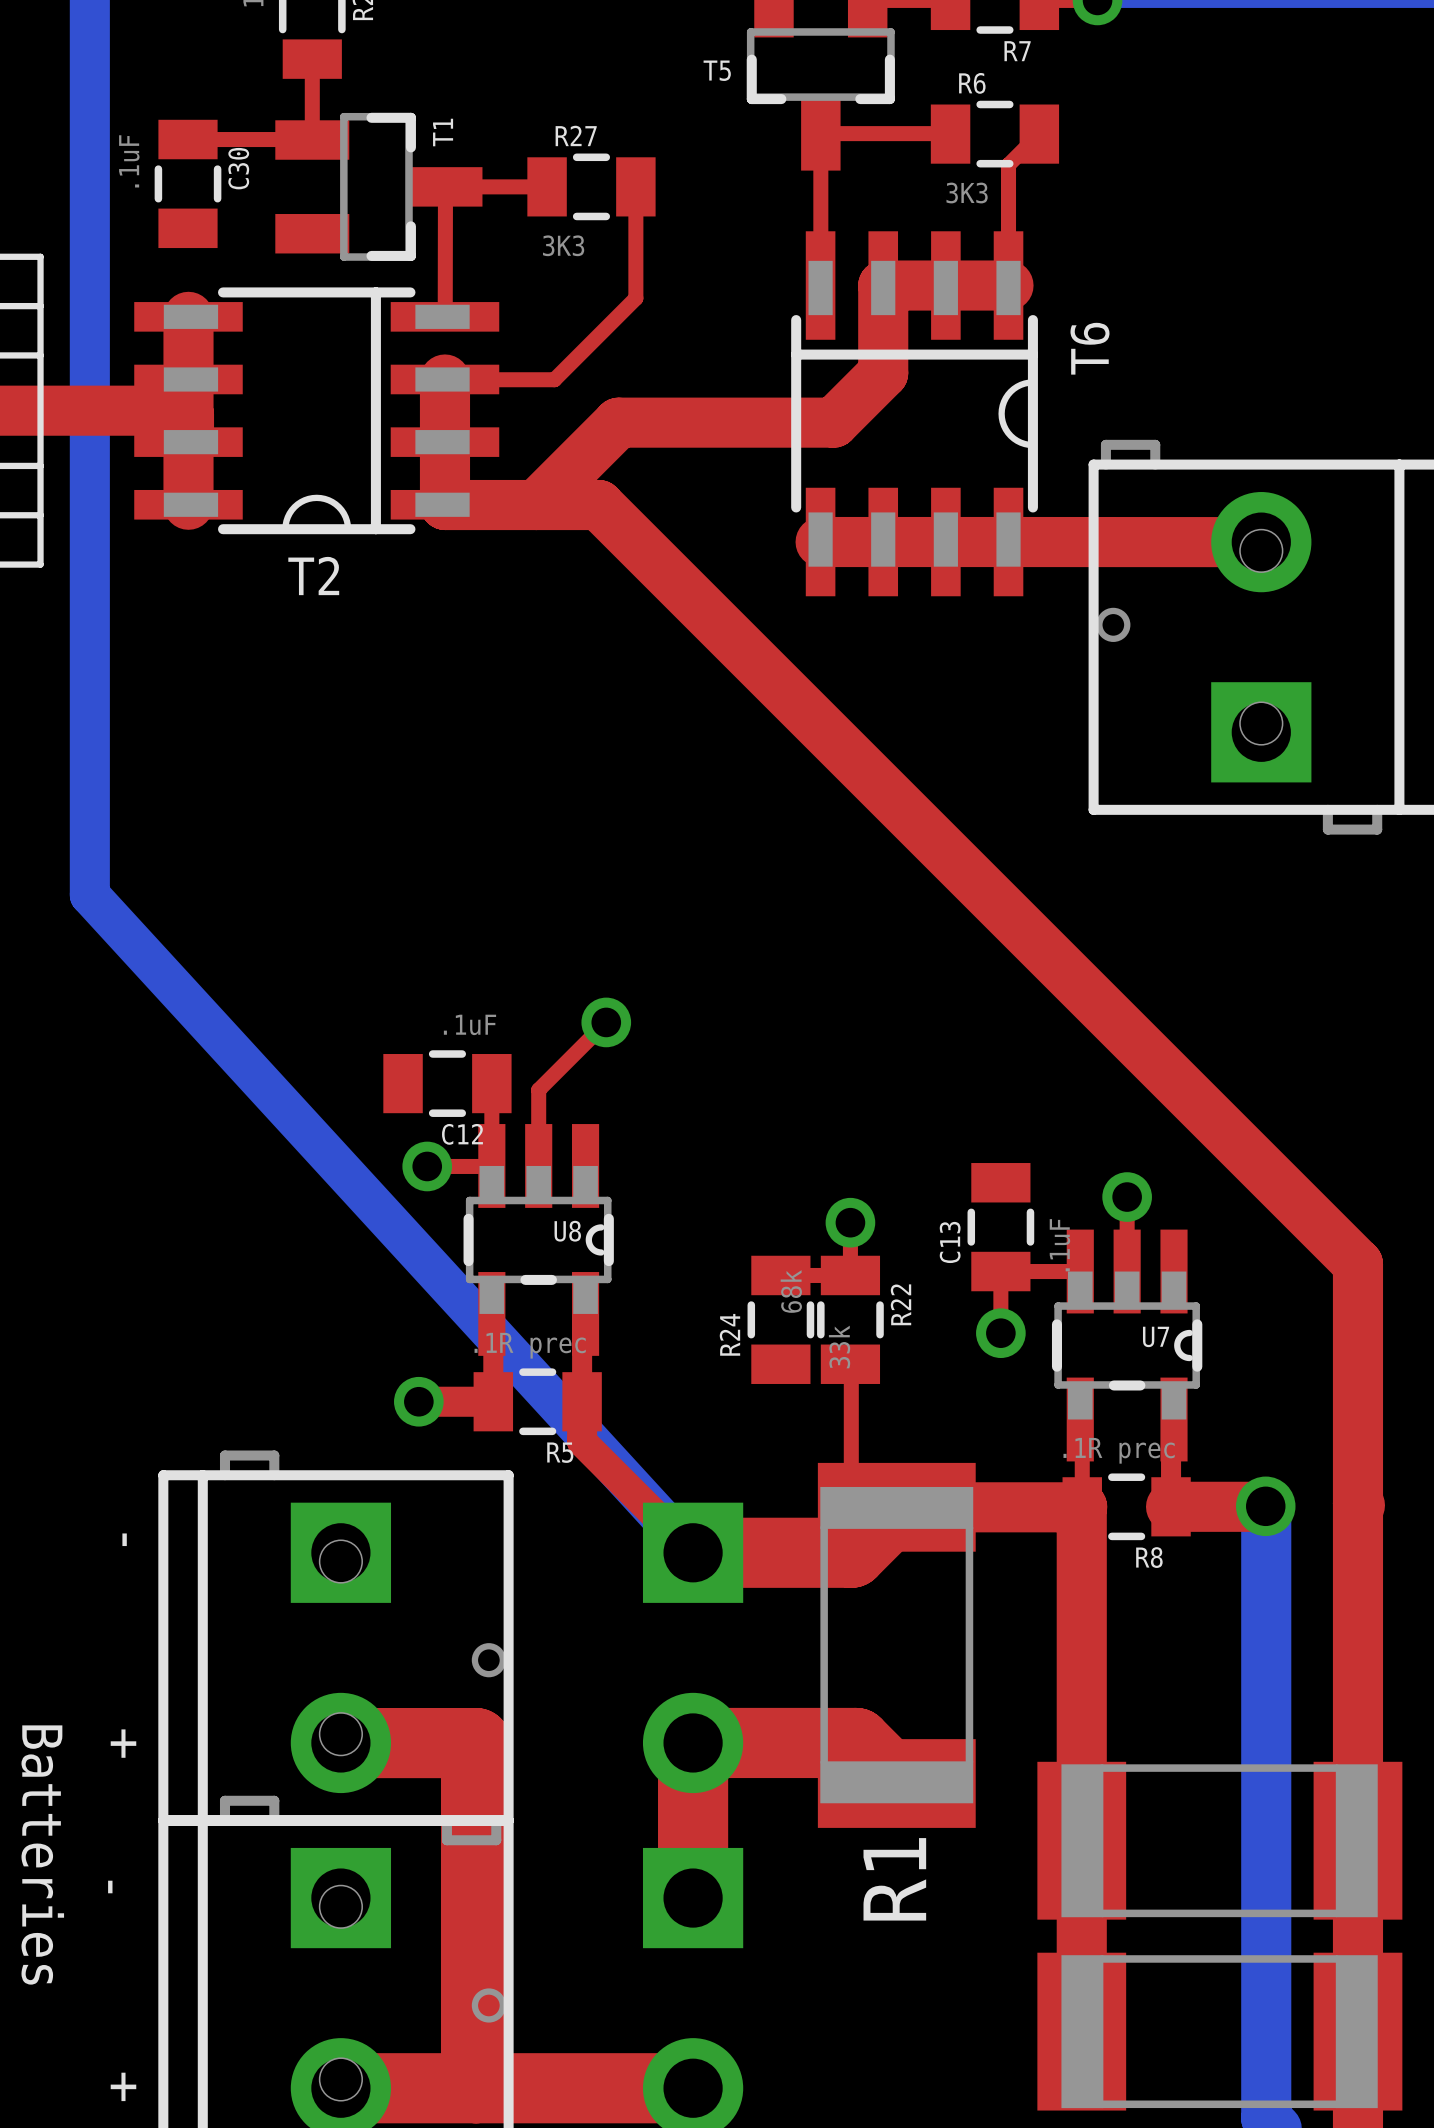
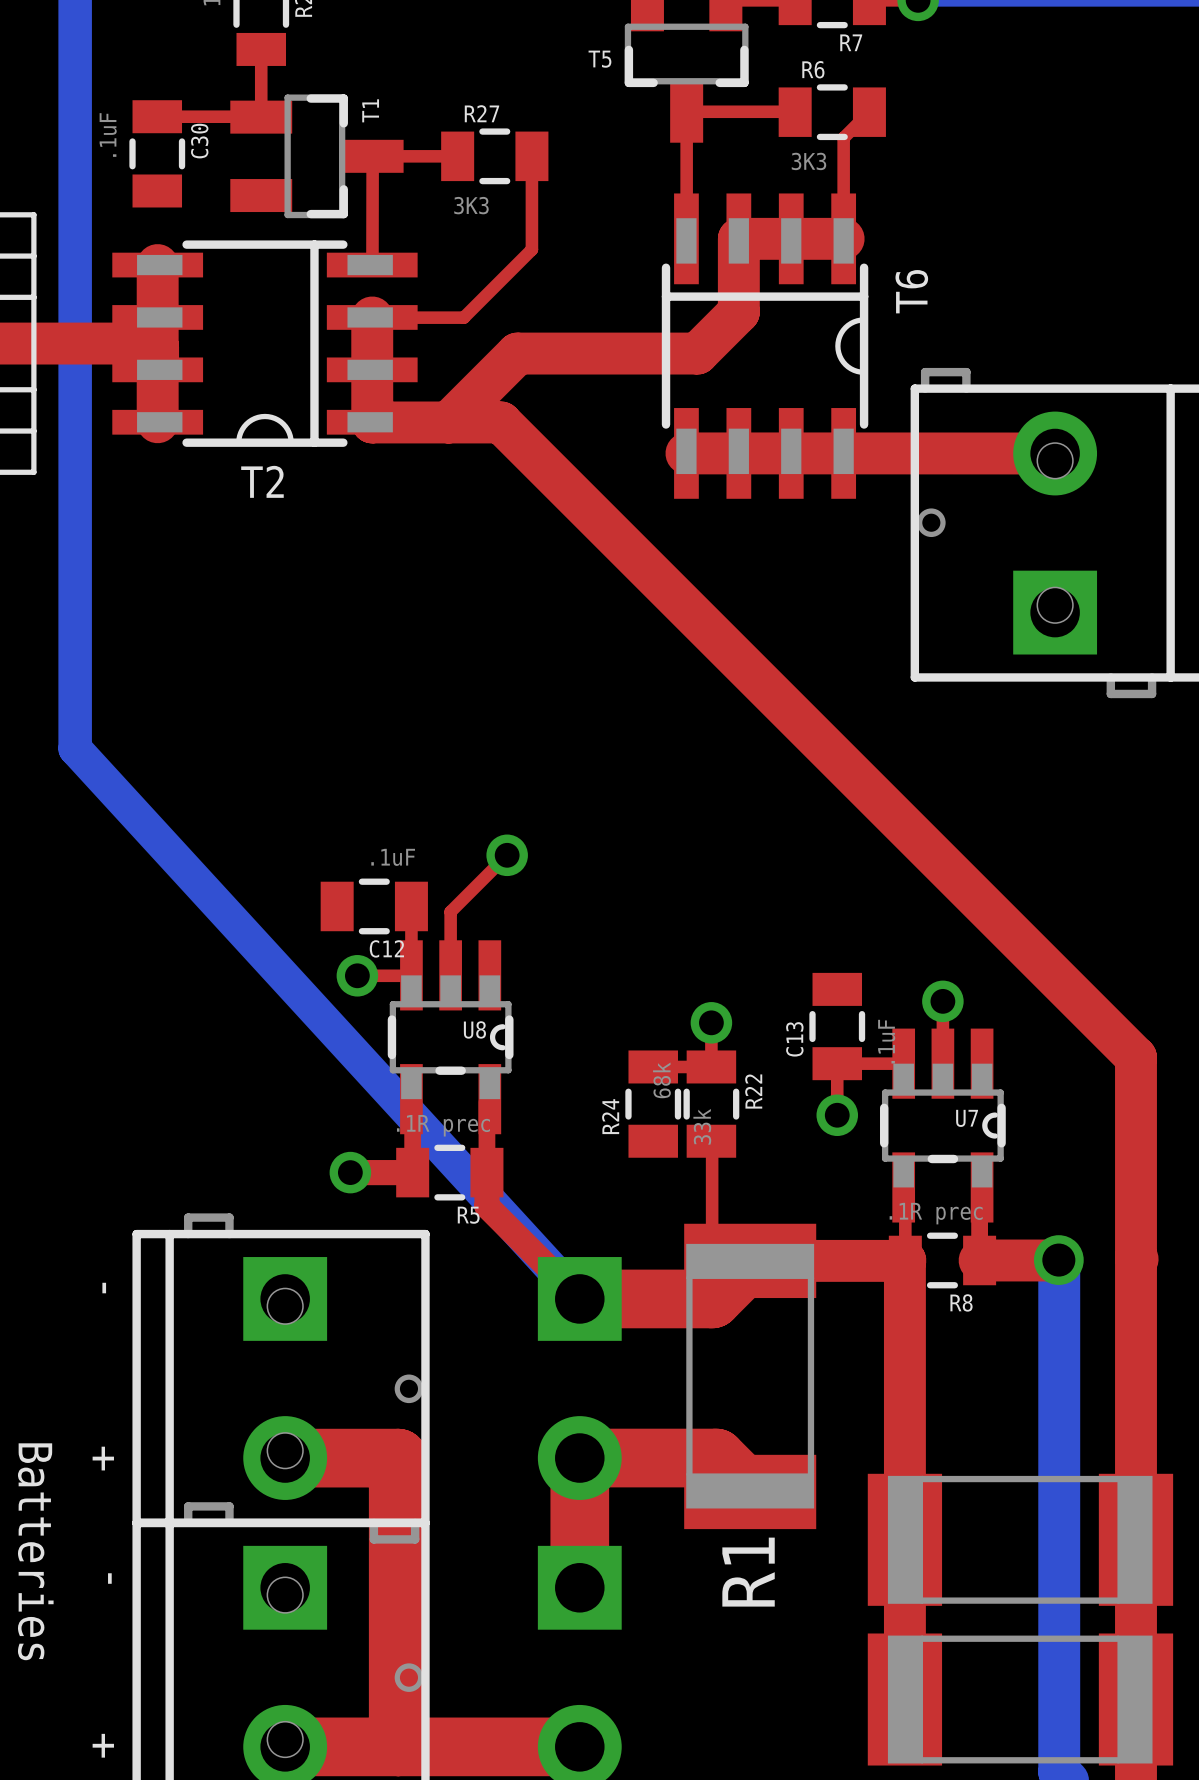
text position: - (110, 1886) -> - (109, 1578)

